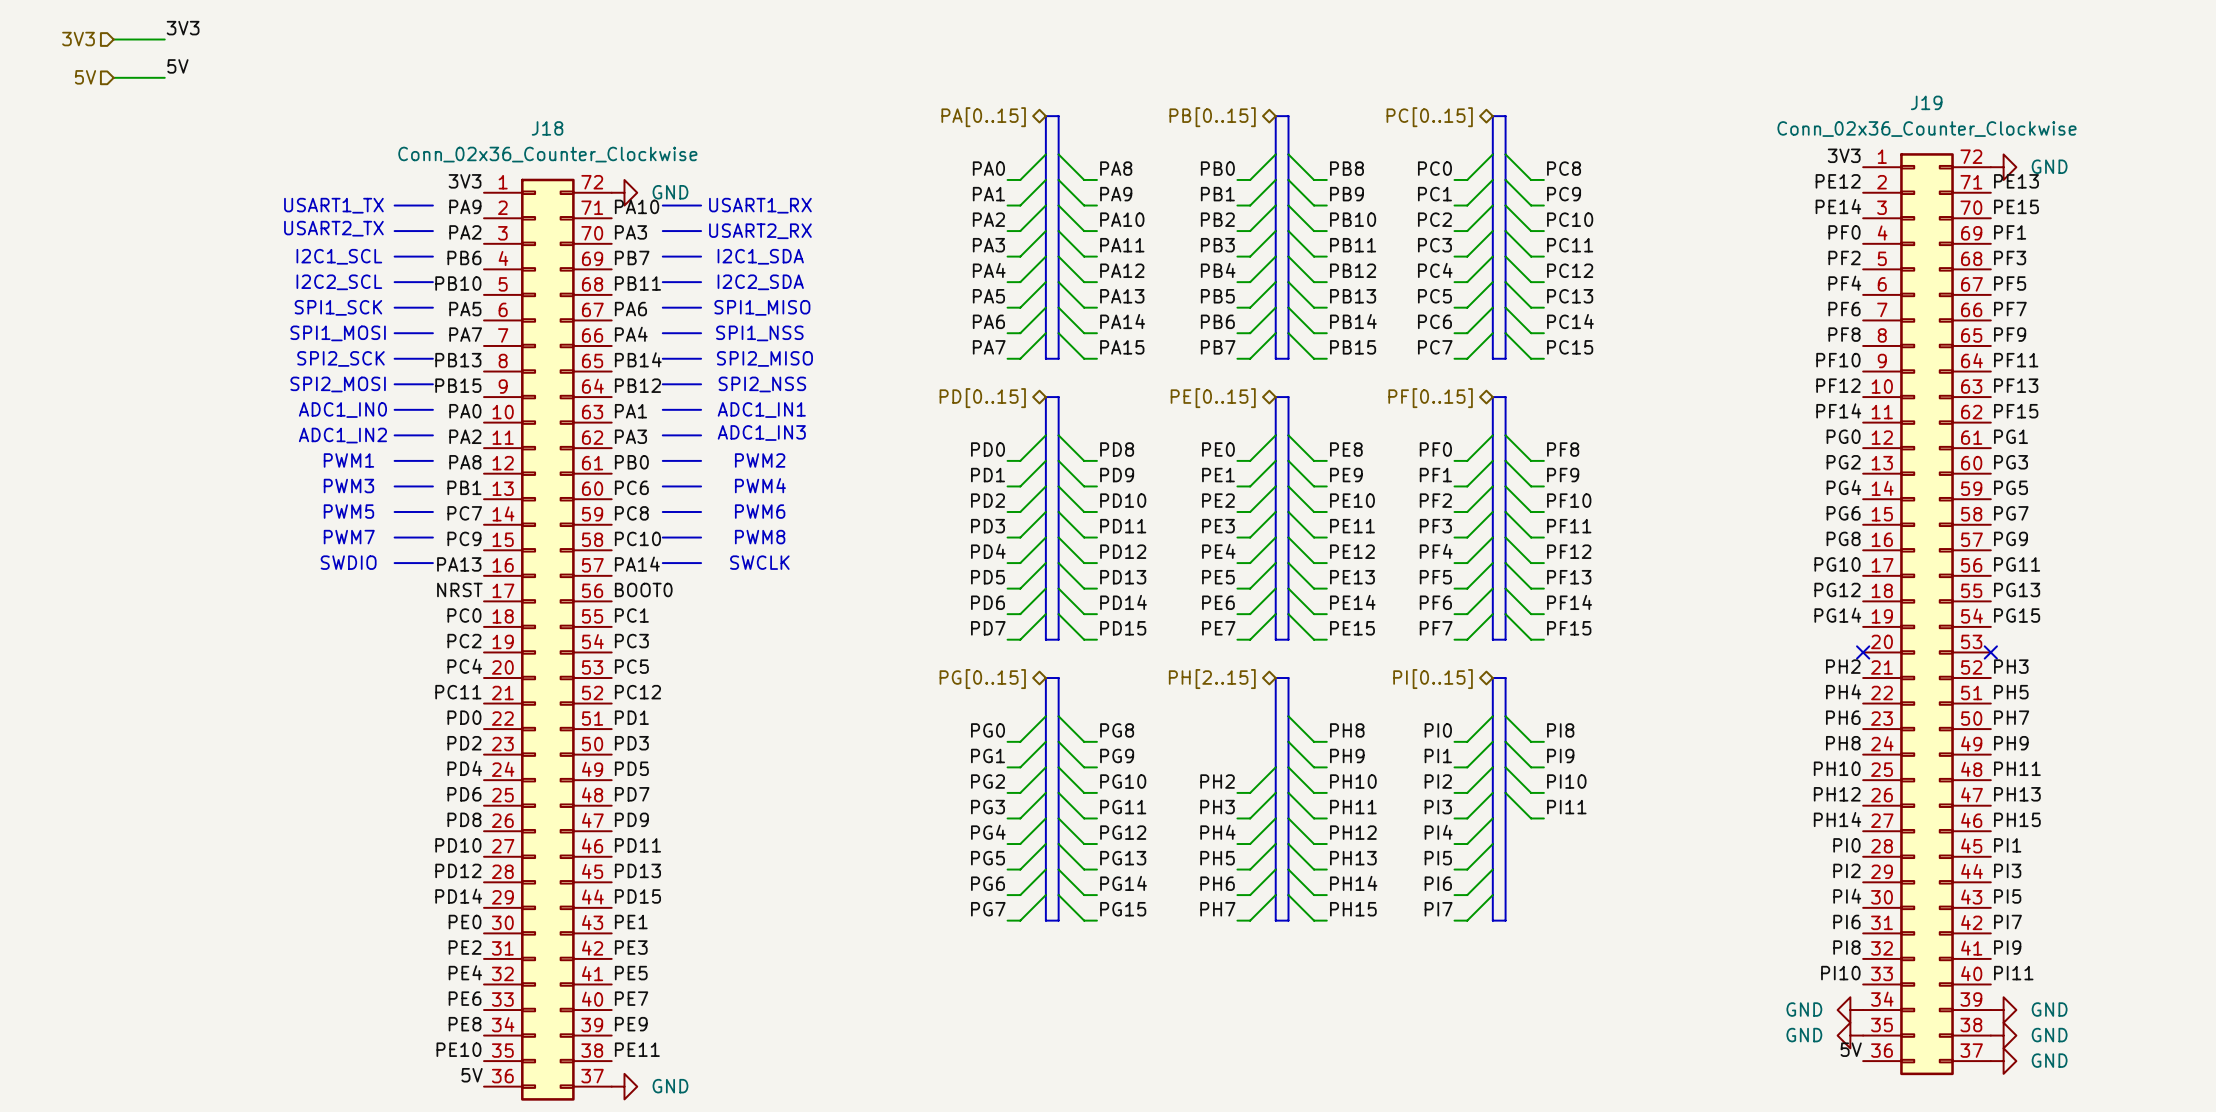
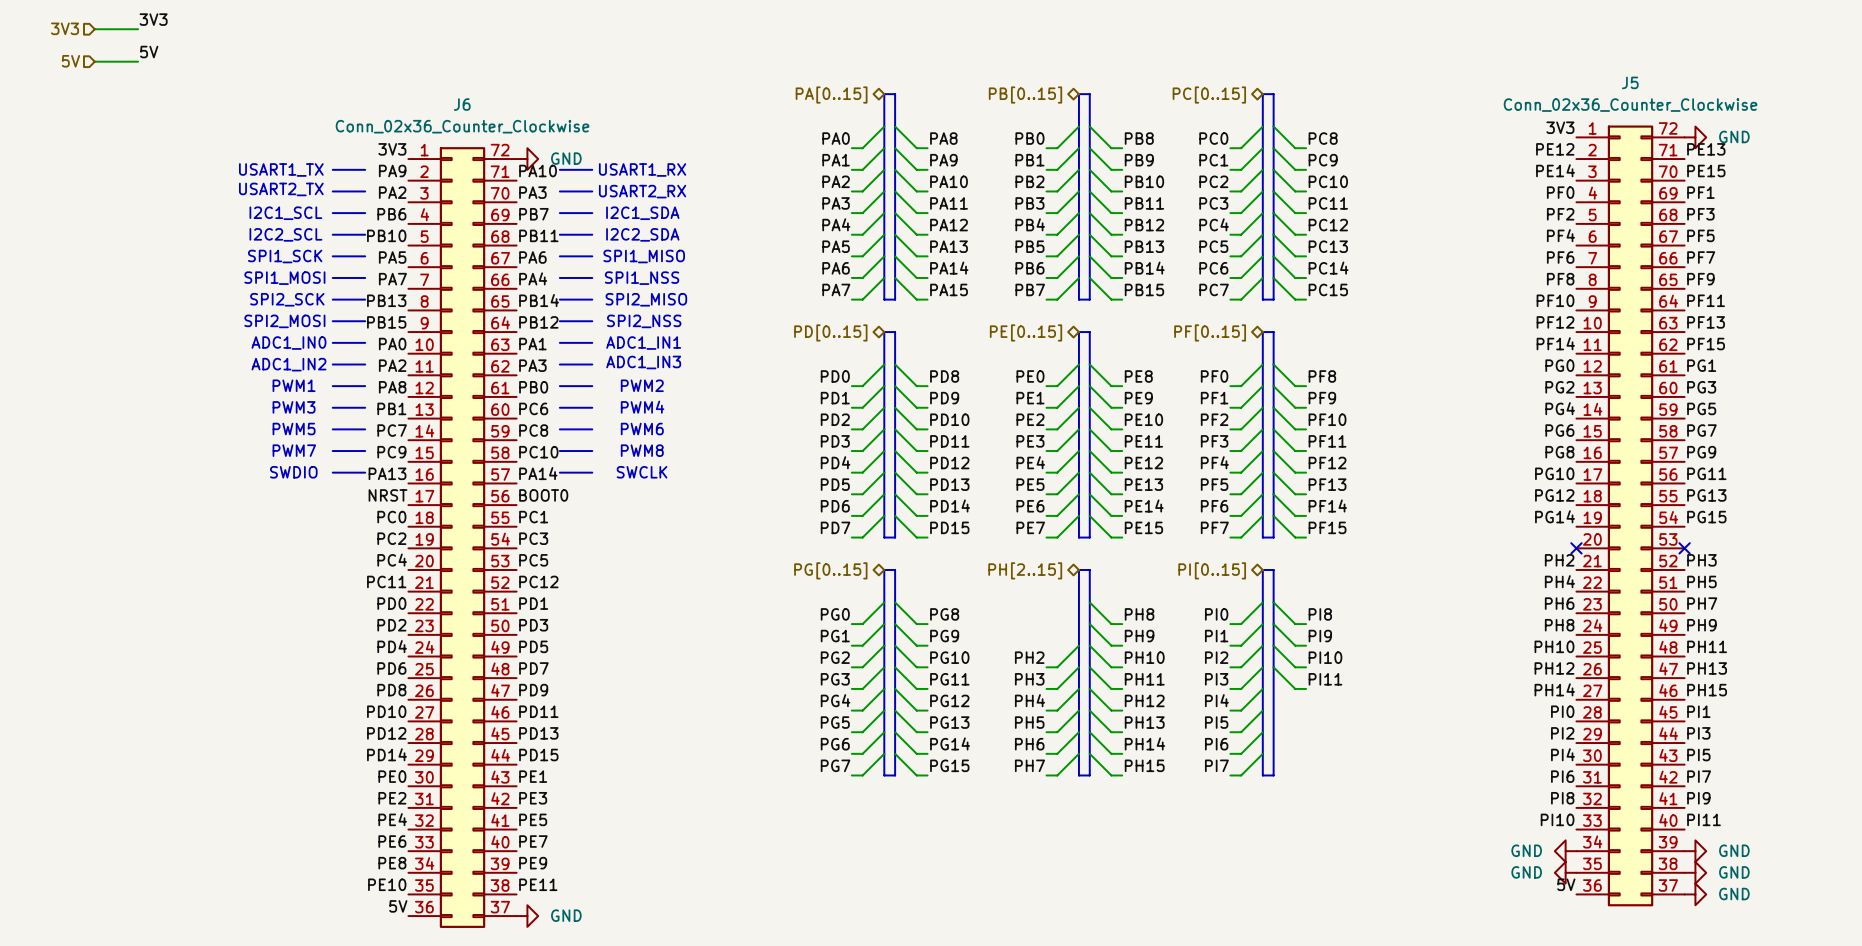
J19 name: J19 (1926, 102) -> J5 (1630, 82)
J18 name: J18 (547, 128) -> J6 (462, 104)

